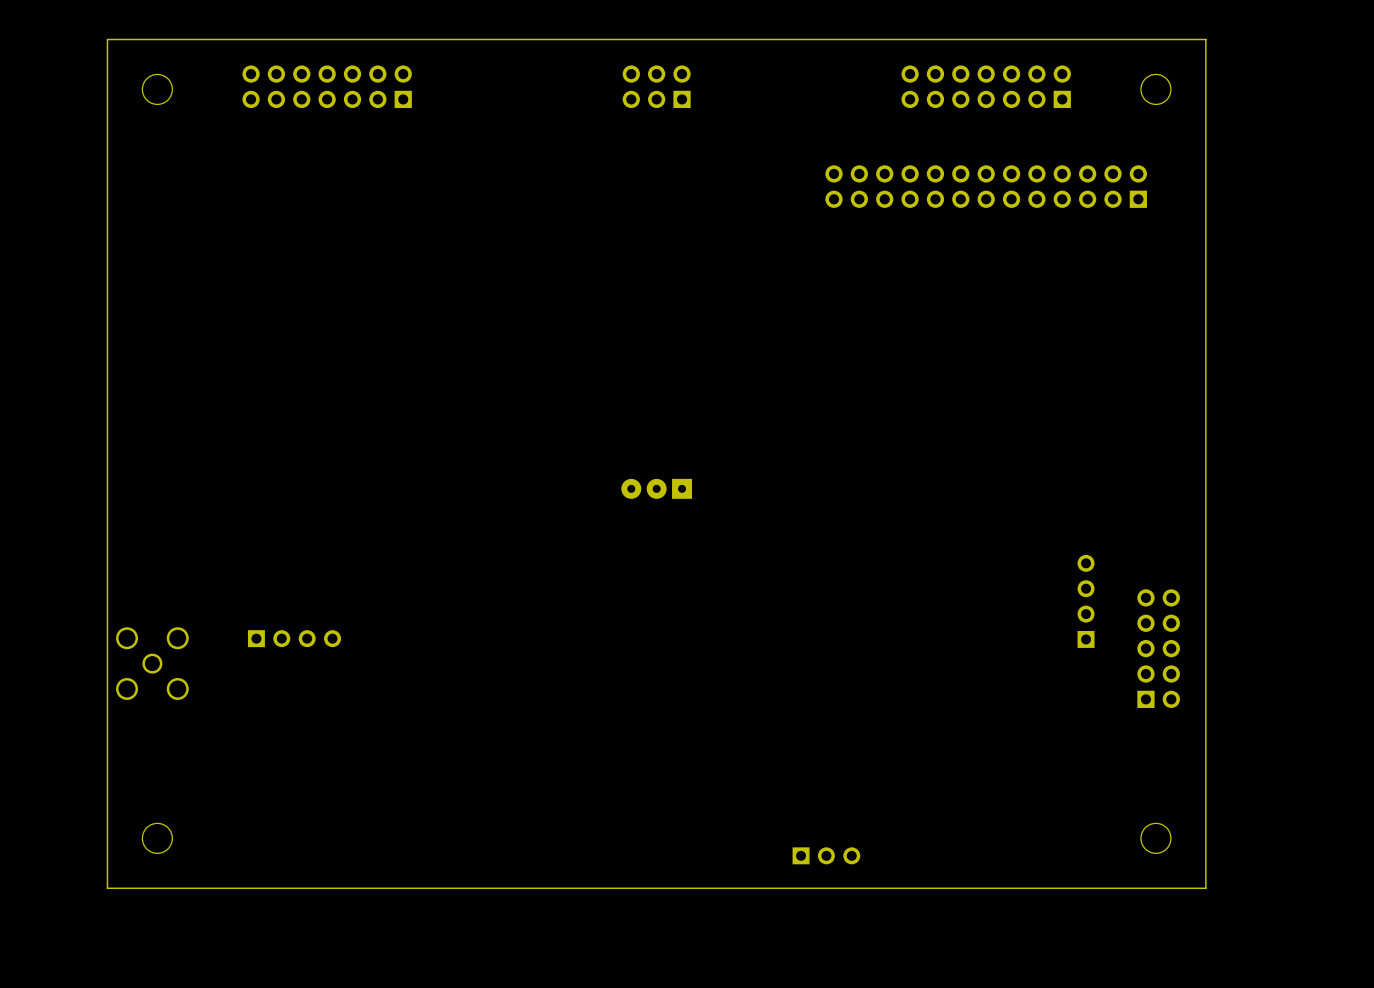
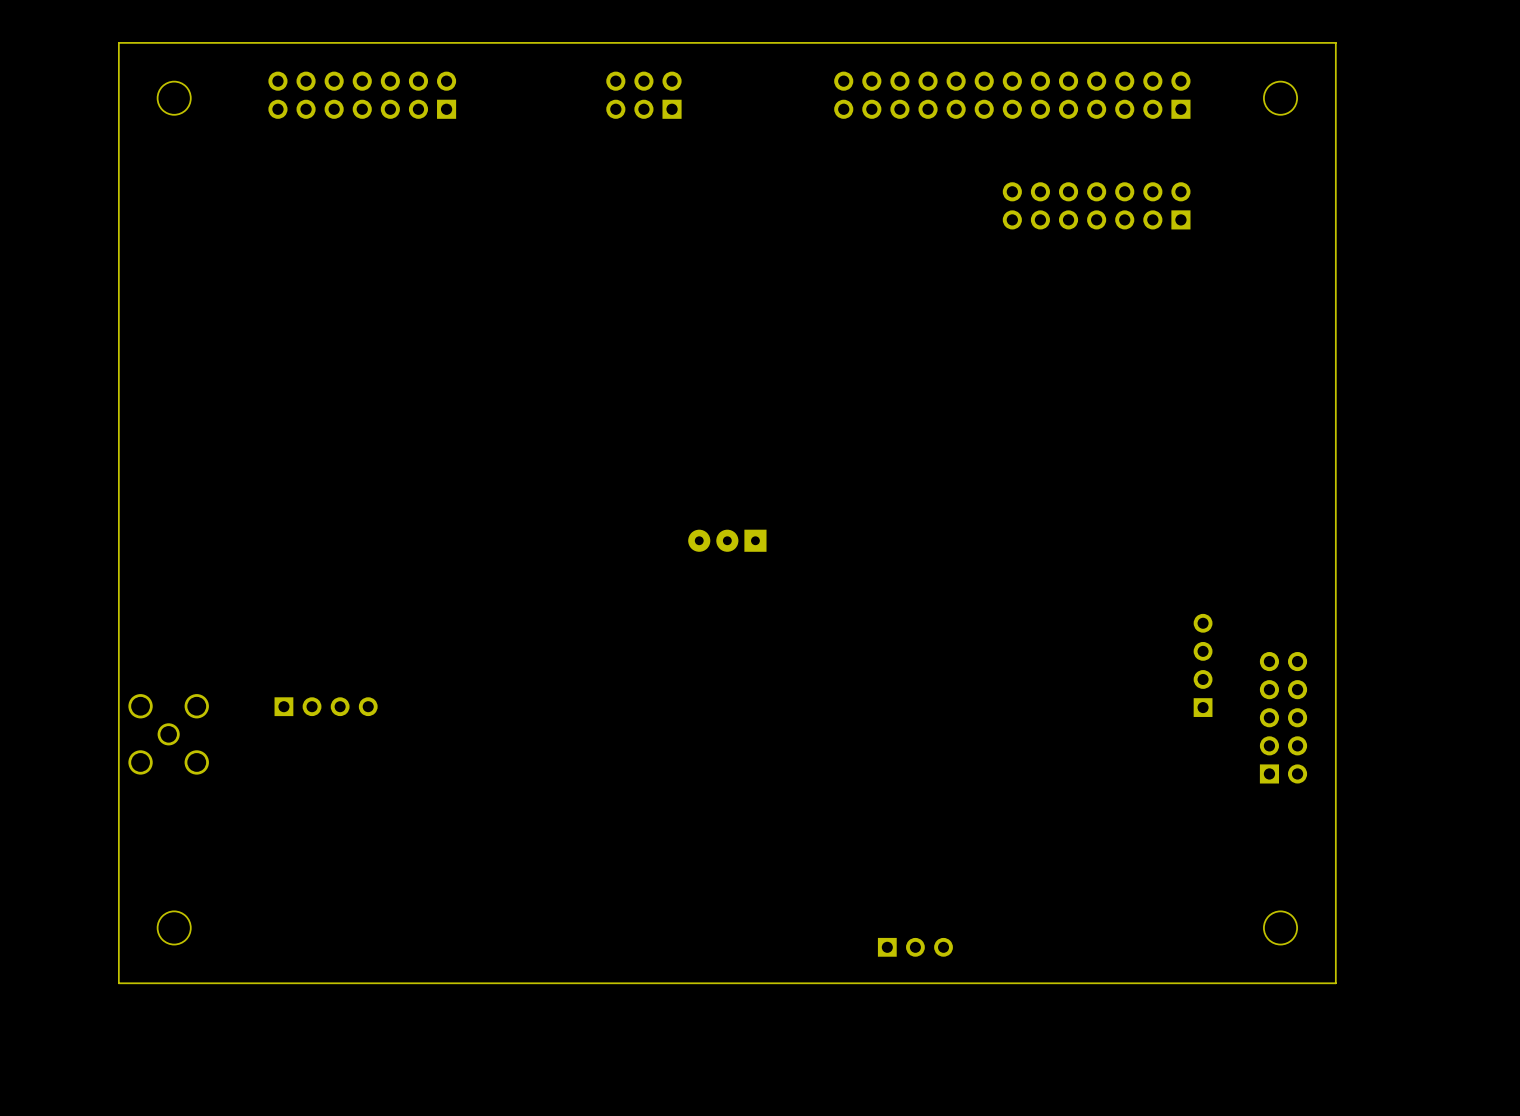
part position: (656, 86) -> (643, 95)
part: none -> (1012, 95)
part: (986, 86) -> none
part footprint: [825, 165, 1147, 208] -> [1002, 182, 1191, 230]

